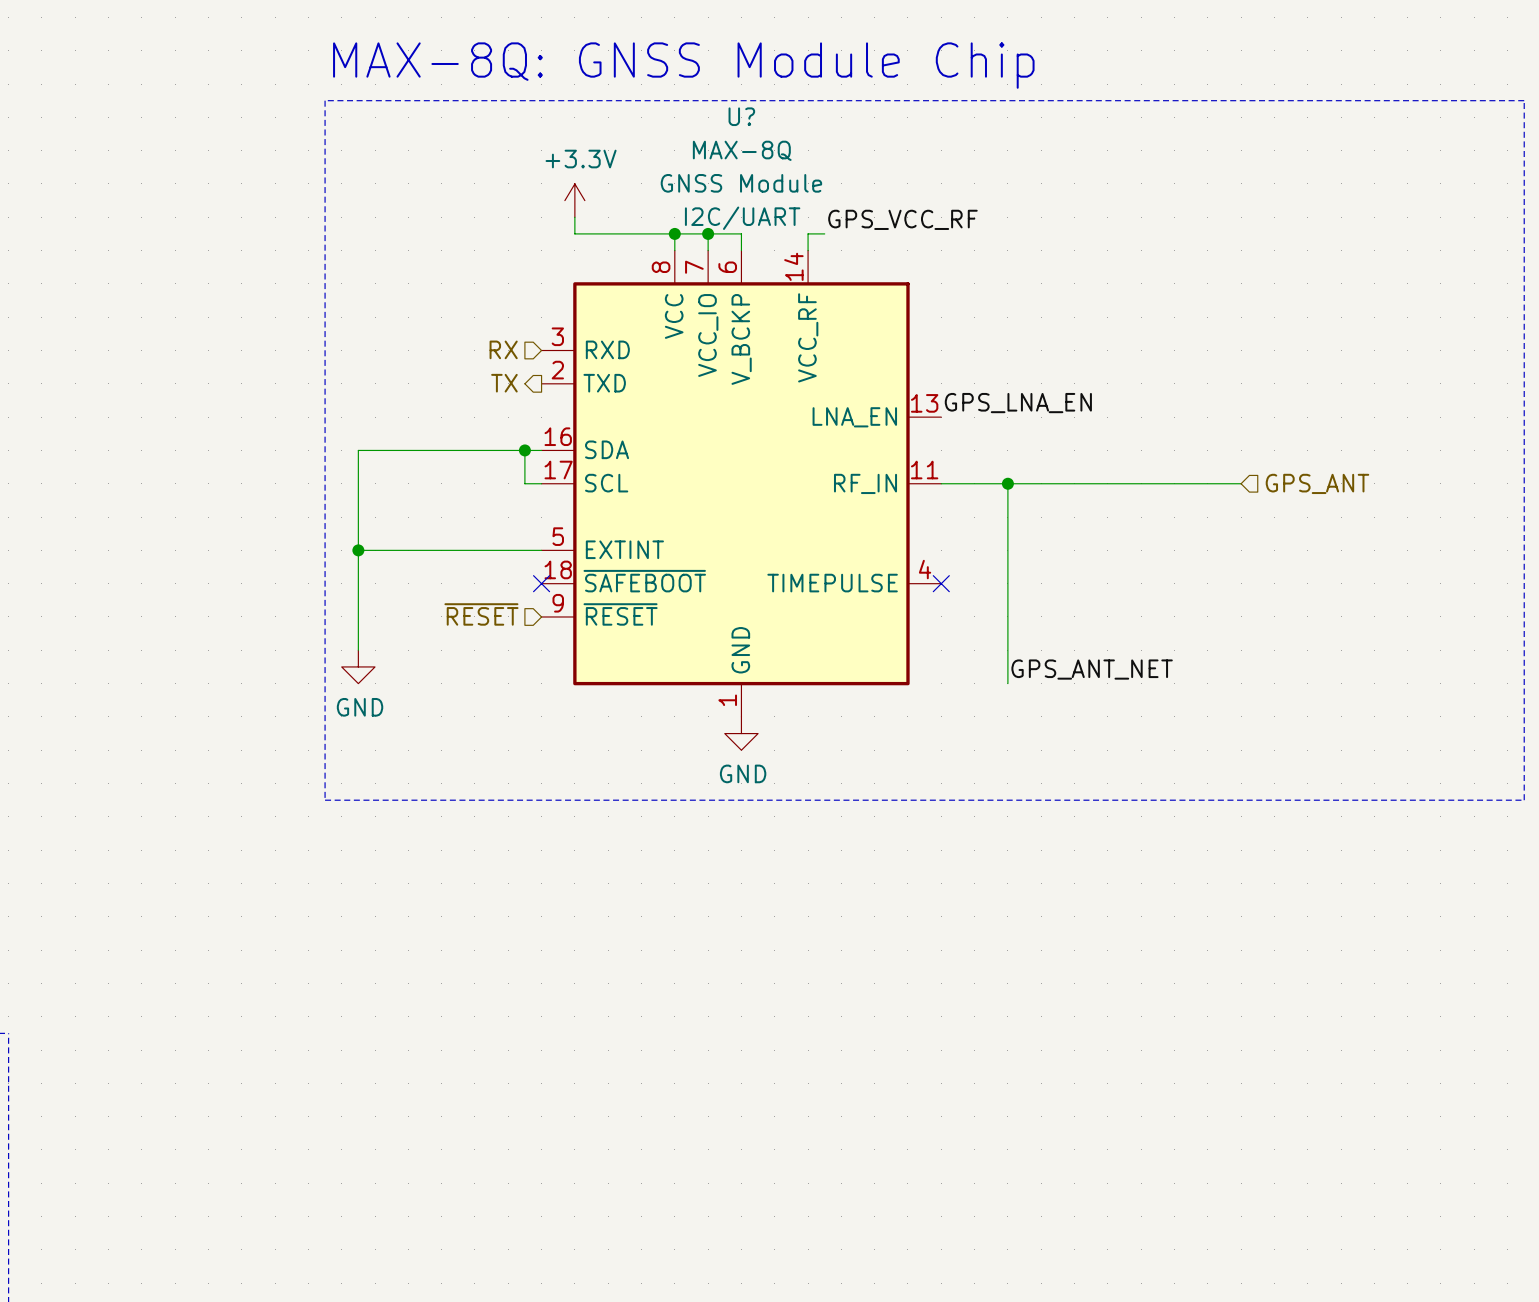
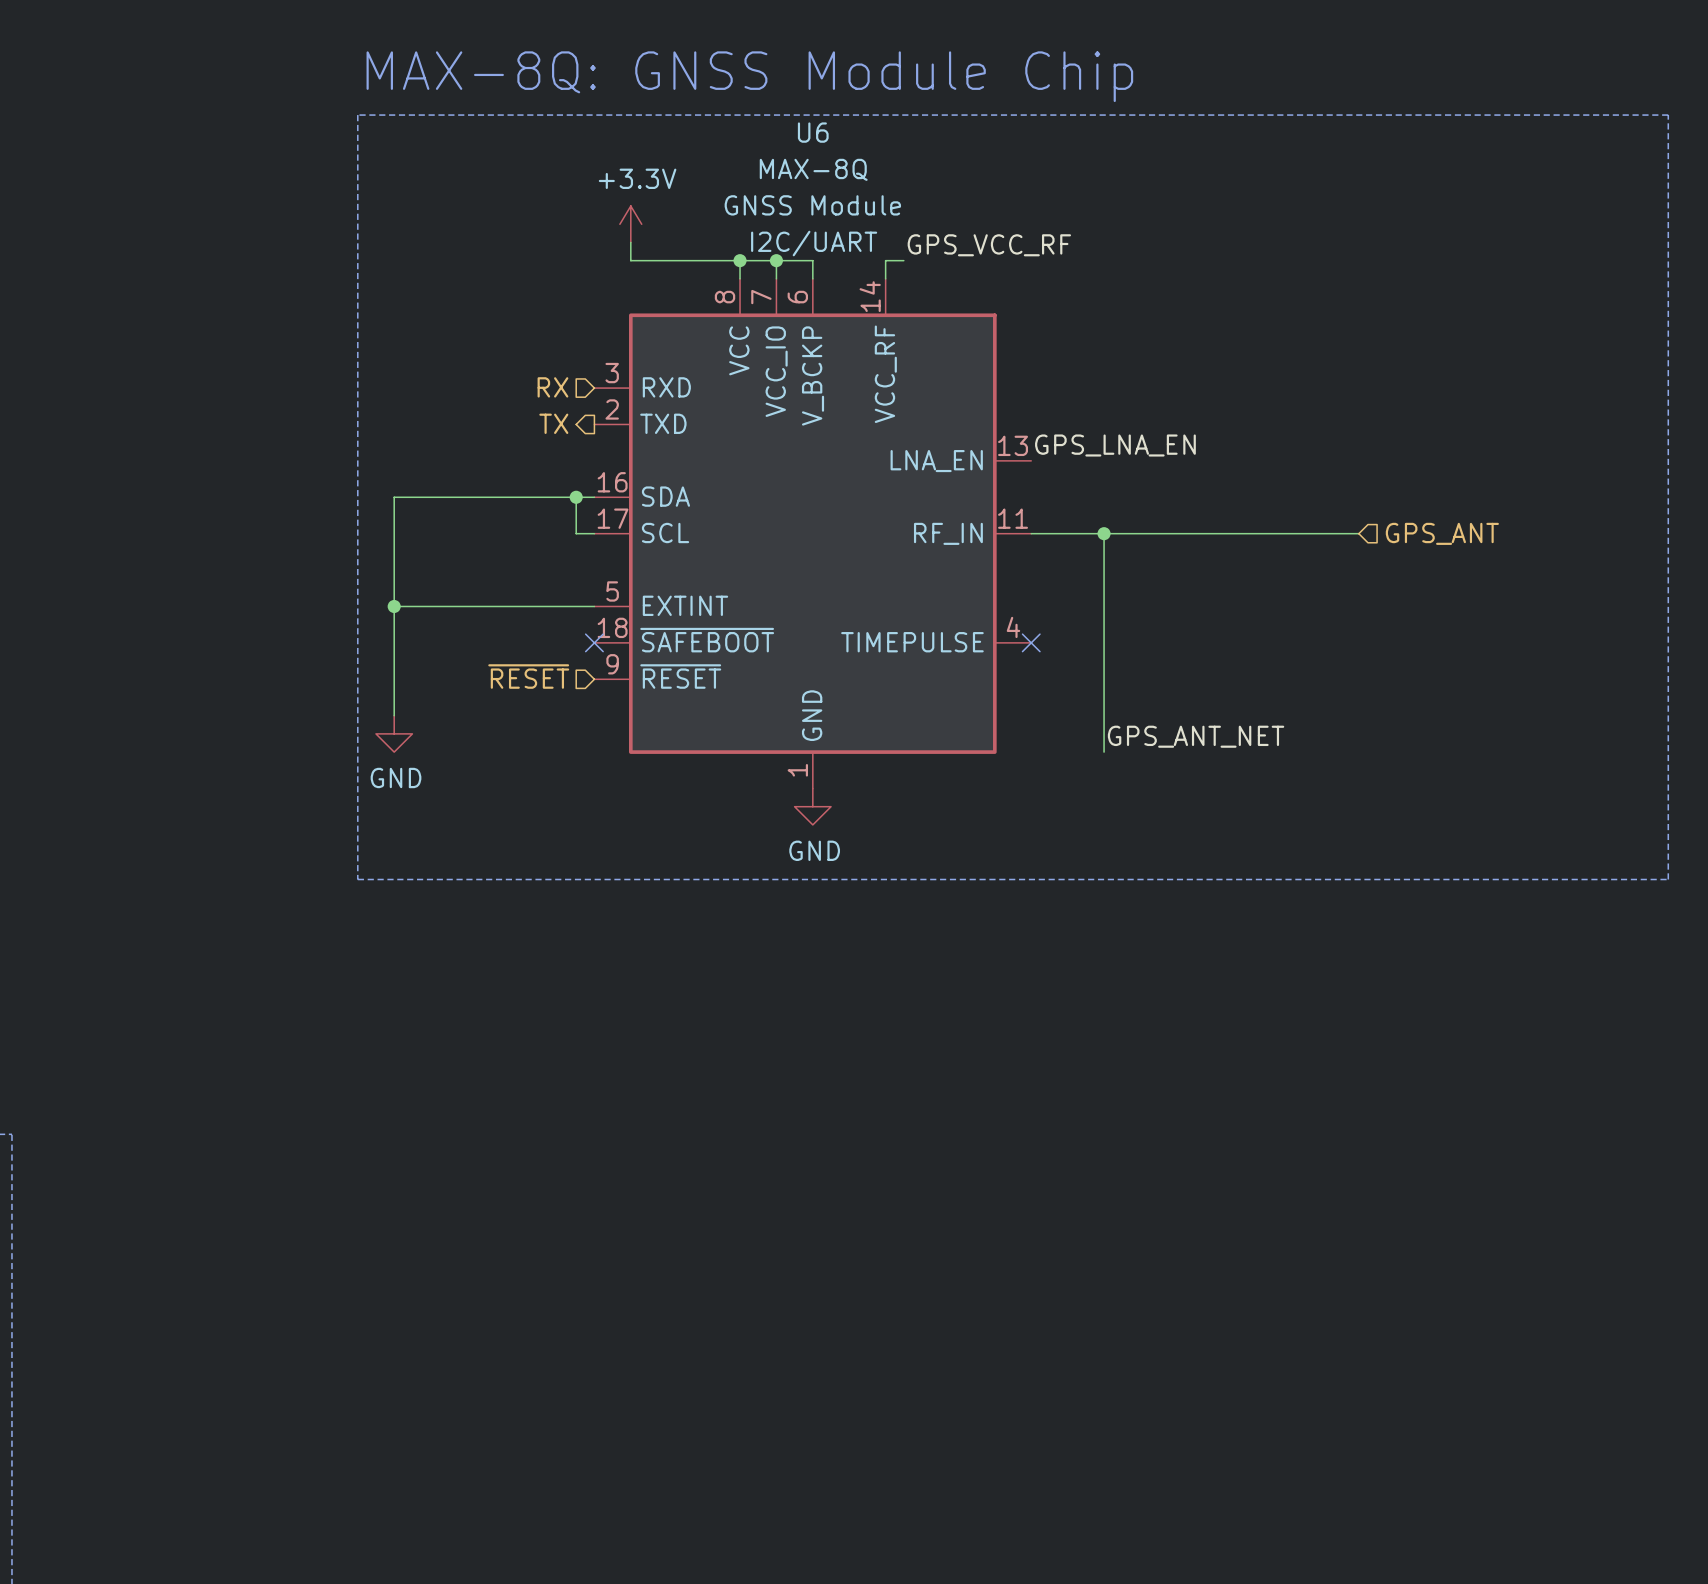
U? name: U? (741, 116) -> U6 (813, 132)

